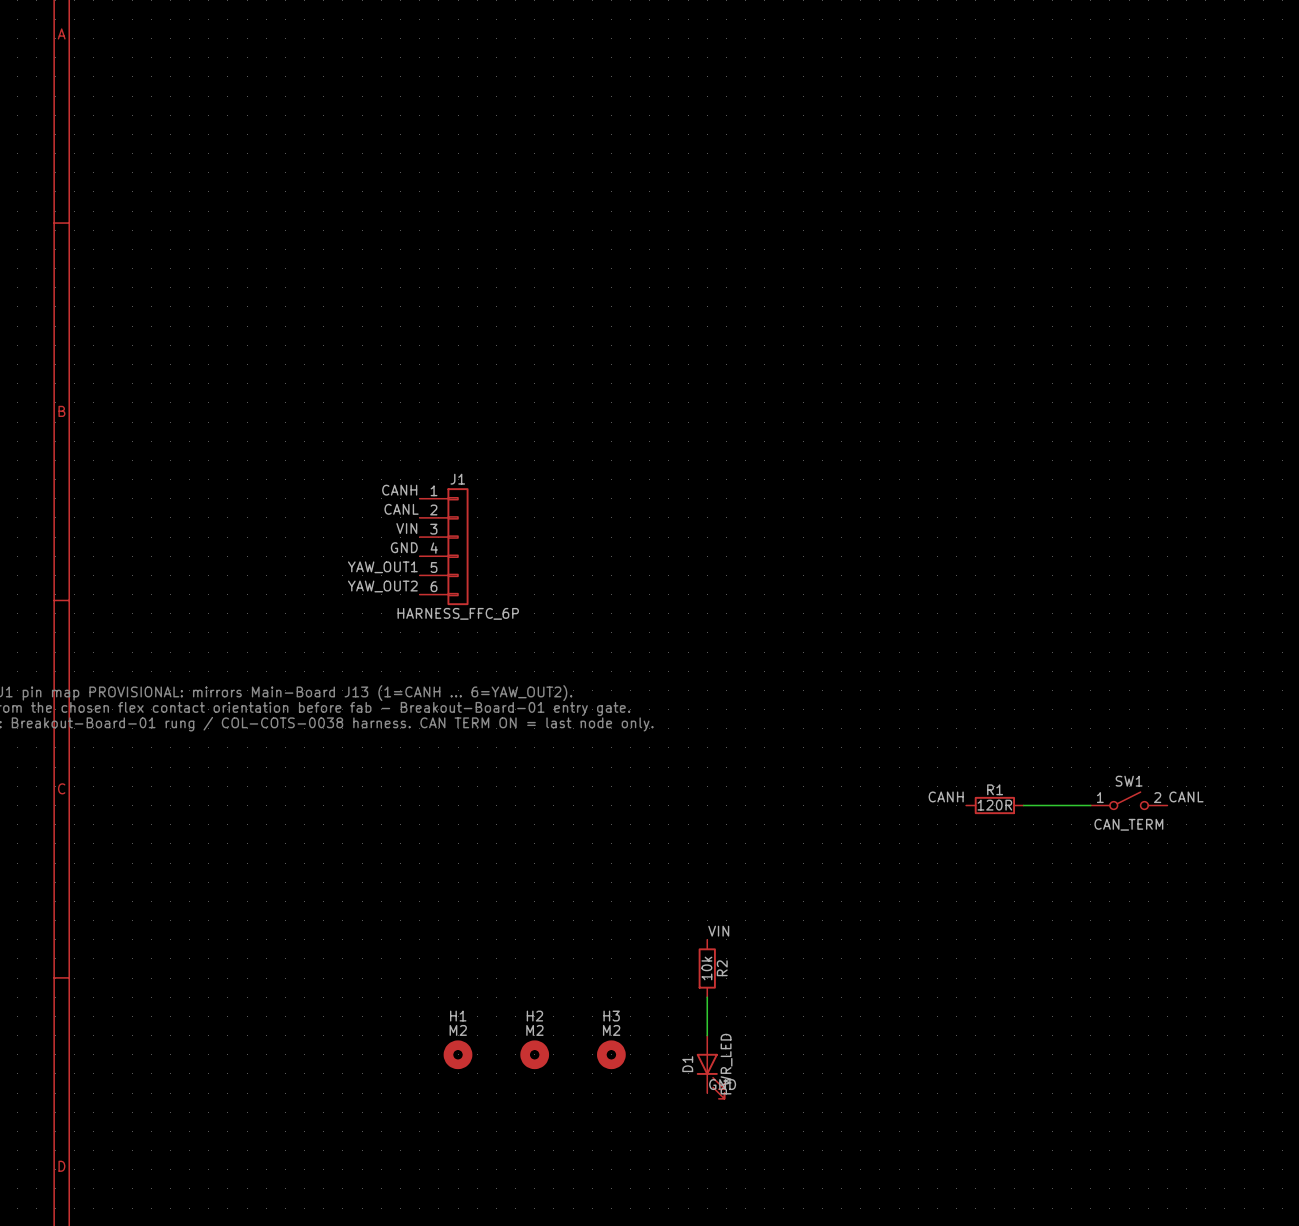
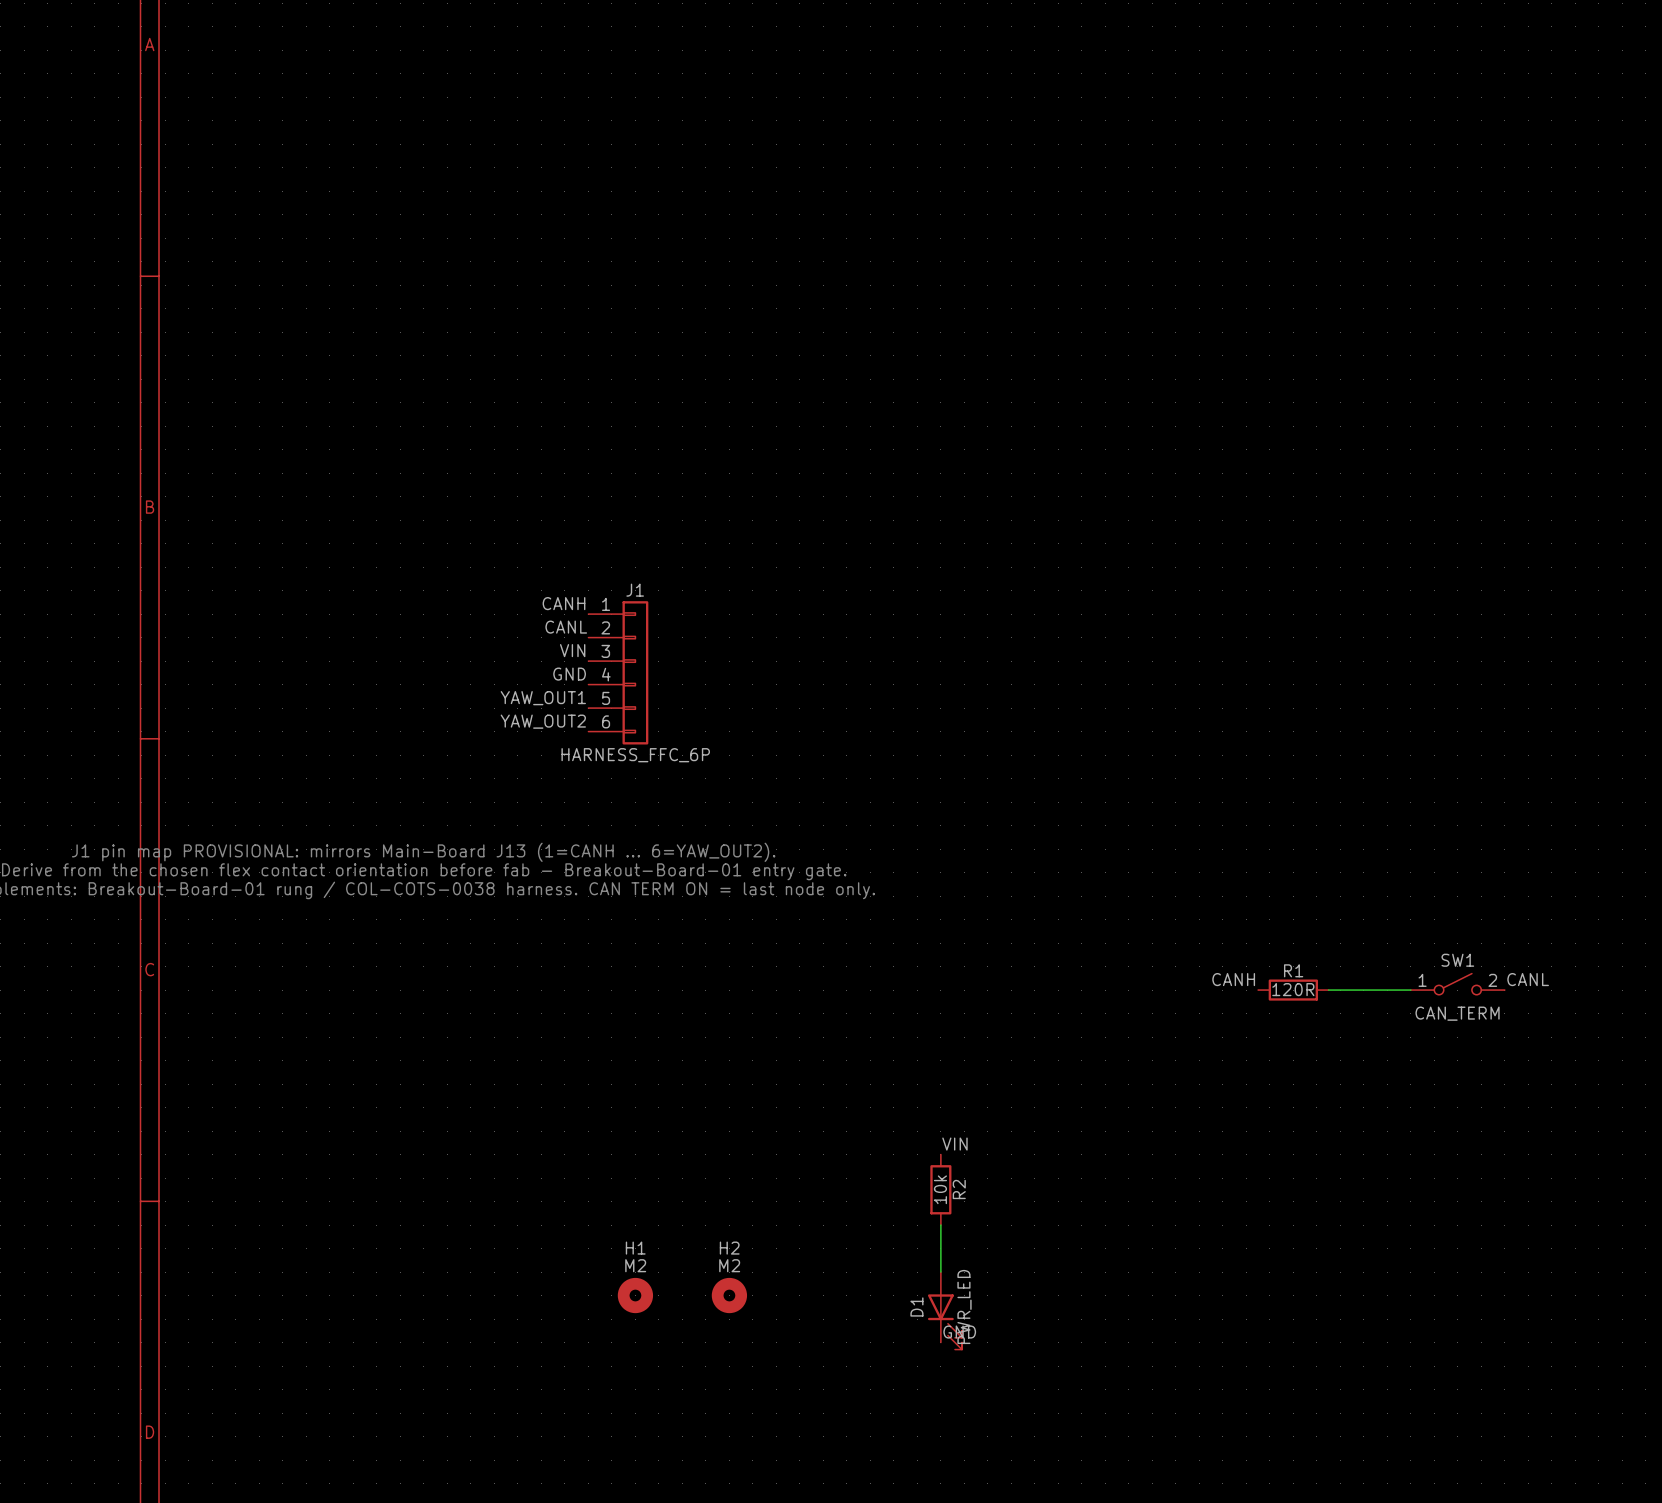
H3: M2 (611, 1054) -> none

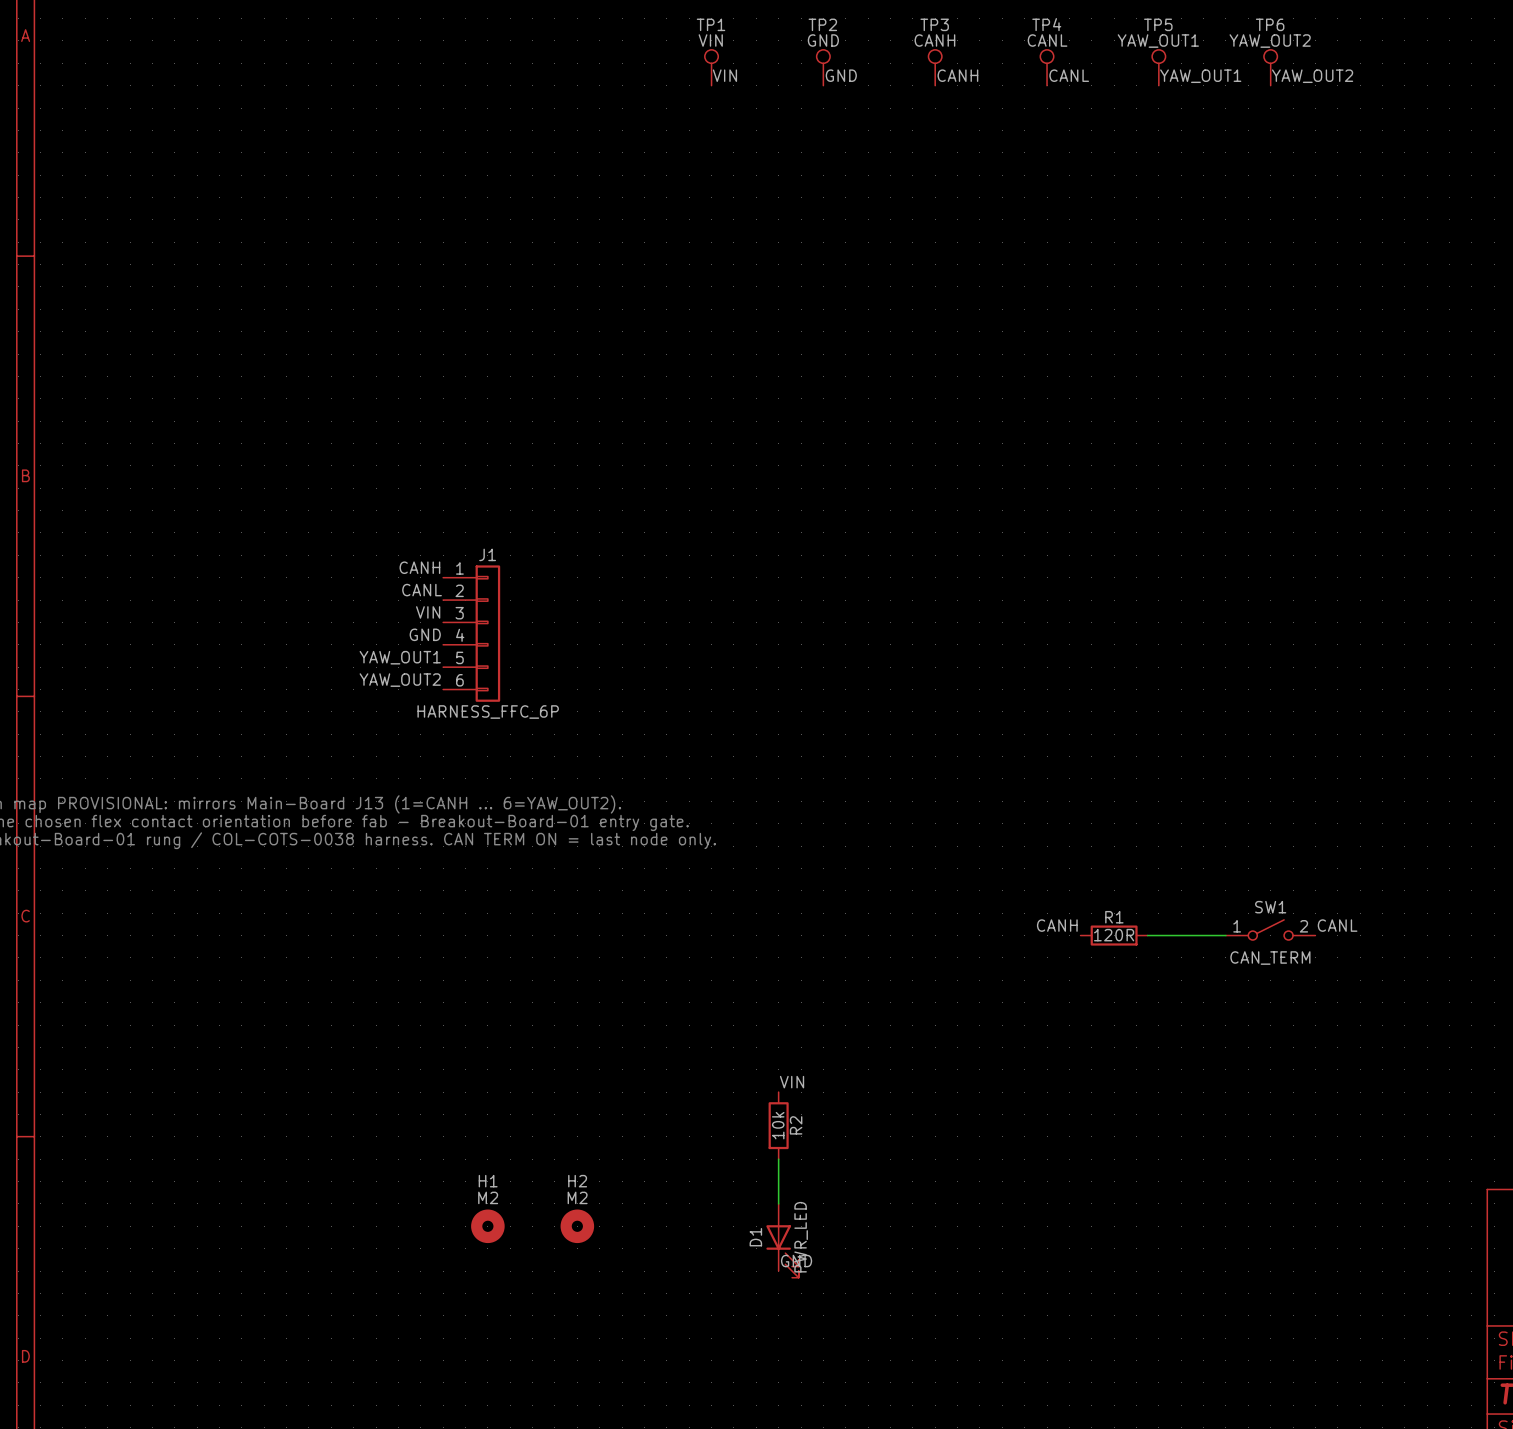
TP1: none -> VIN (711, 67)
TP2: none -> GND (823, 67)
TP3: none -> CANH (935, 67)
TP4: none -> CANL (1047, 67)
TP5: none -> YAW_OUT1 (1158, 67)
TP6: none -> YAW_OUT2 (1270, 67)
label: none -> VIN (724, 75)
label: none -> GND (841, 75)
label: none -> CANH (957, 75)
label: none -> CANL (1069, 75)
label: none -> YAW_OUT1 (1200, 76)
label: none -> YAW_OUT2 (1312, 76)

